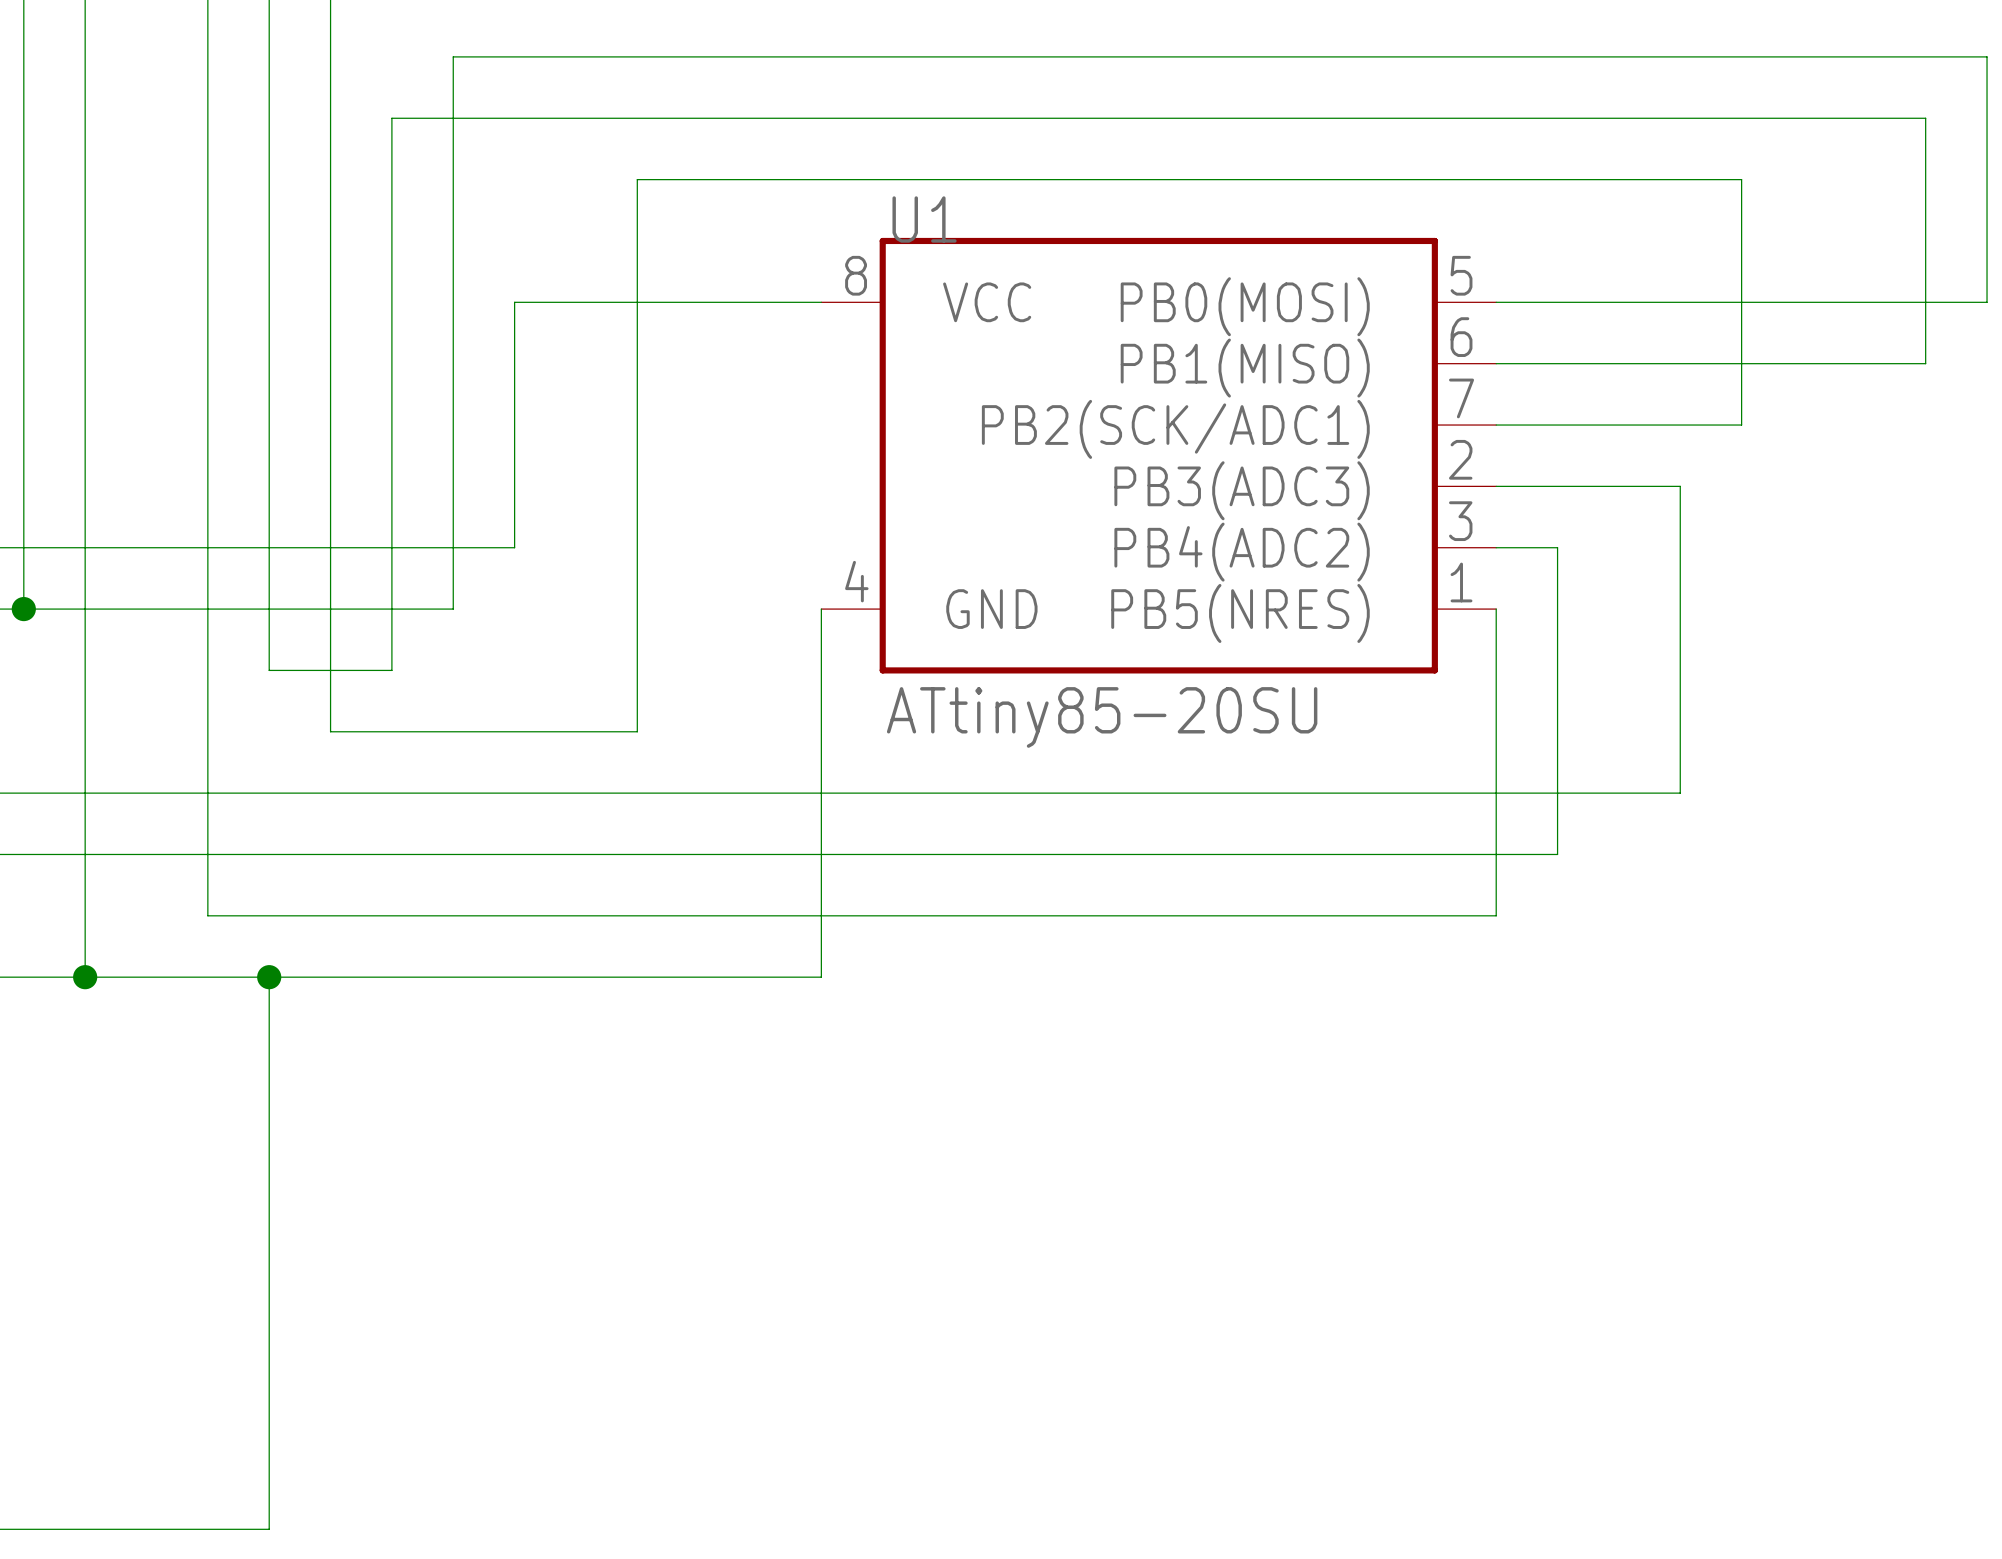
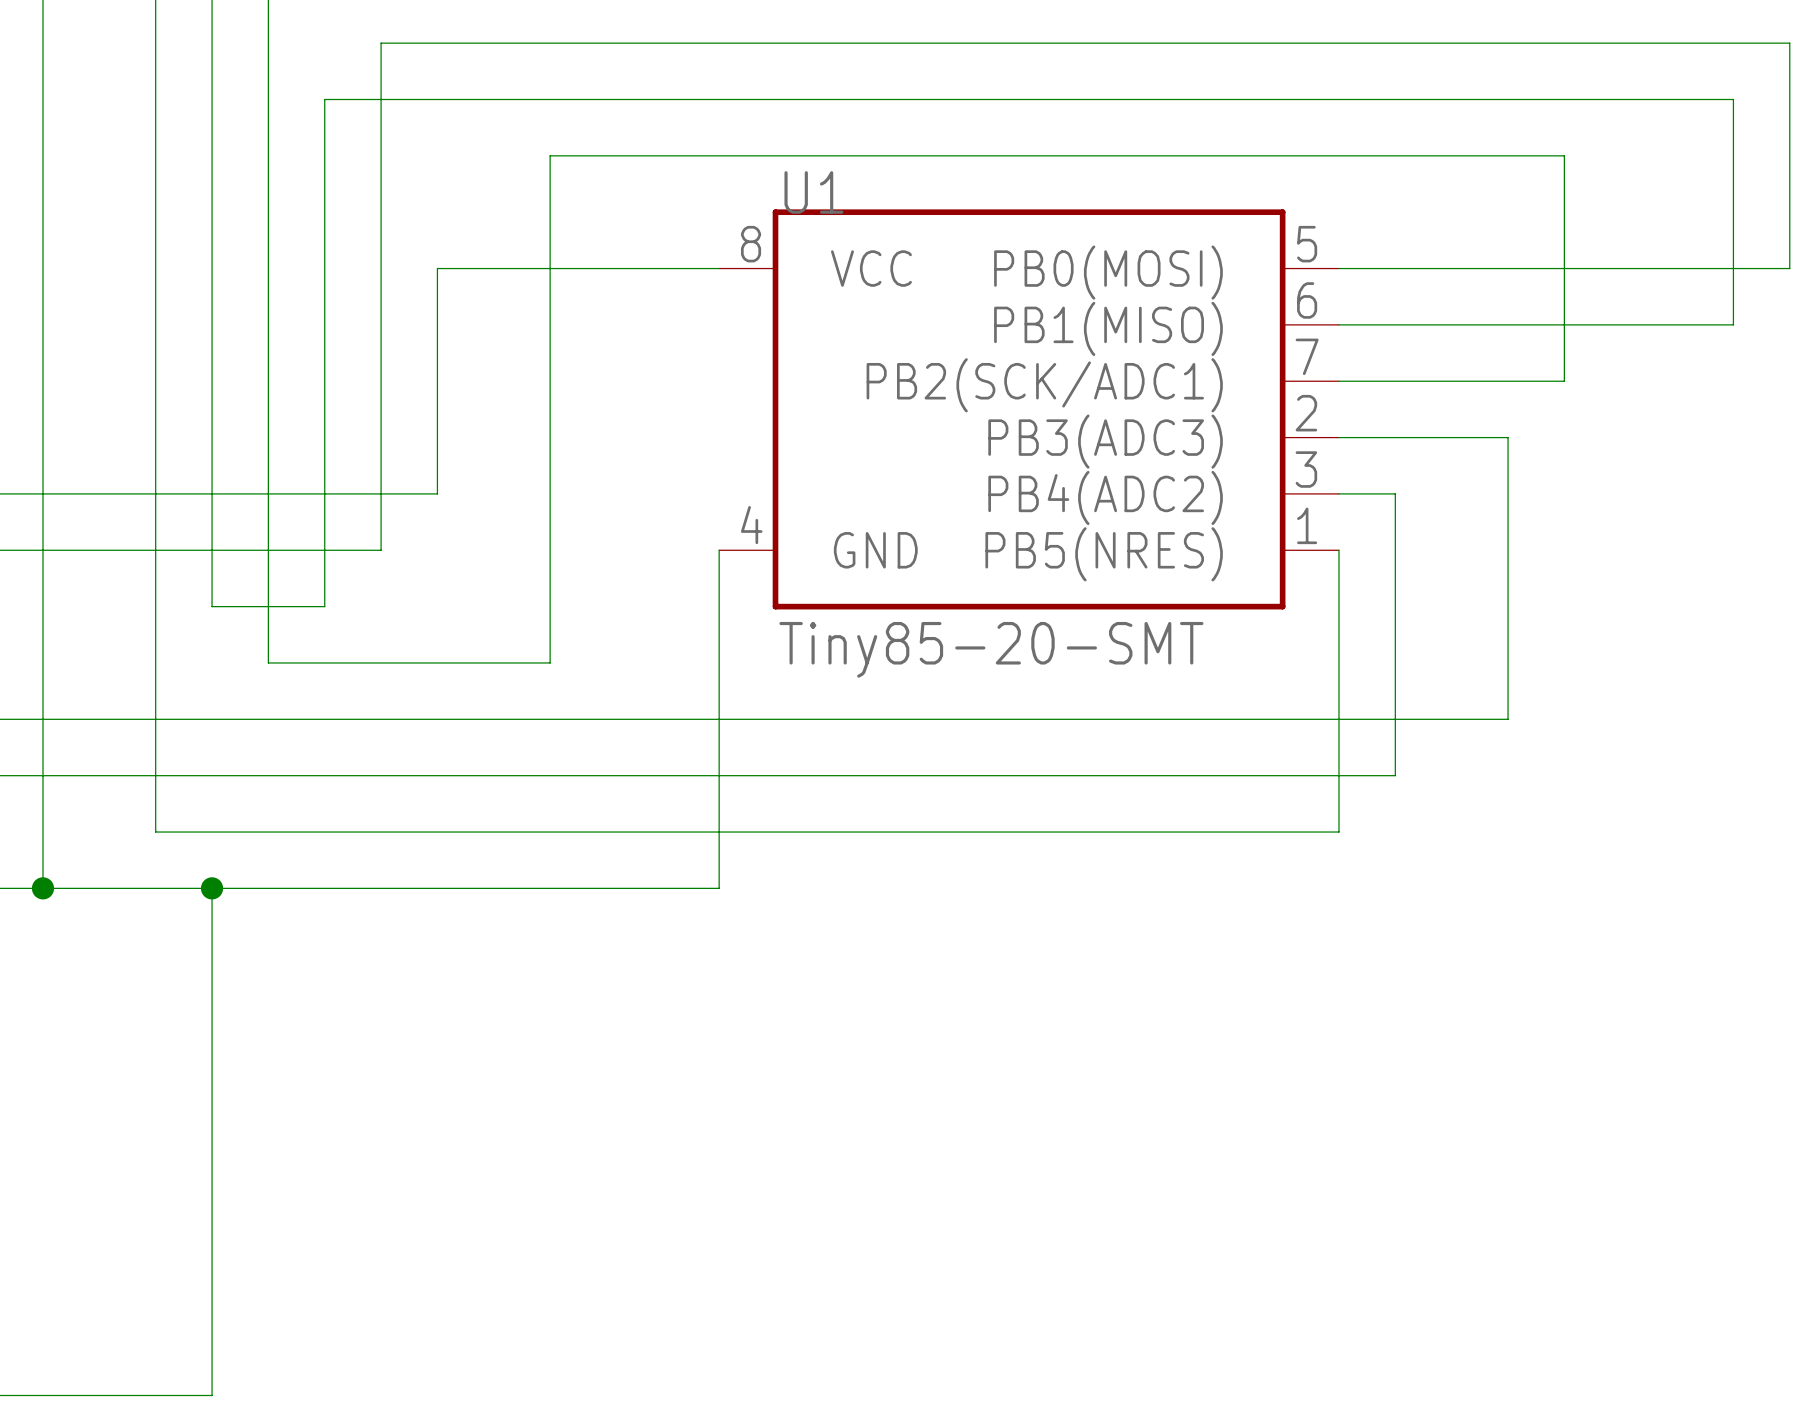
U1 value: ATtiny85-20SU (1102, 717) -> Tiny85-20-SMT (991, 649)

